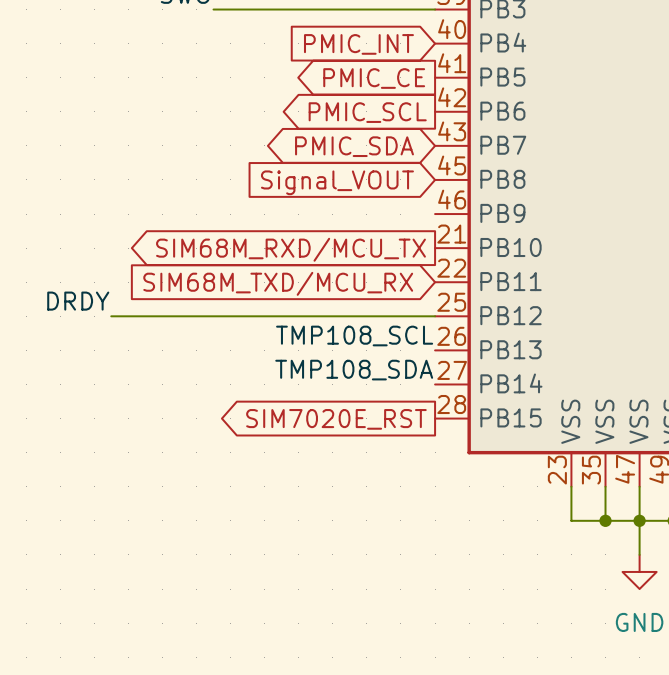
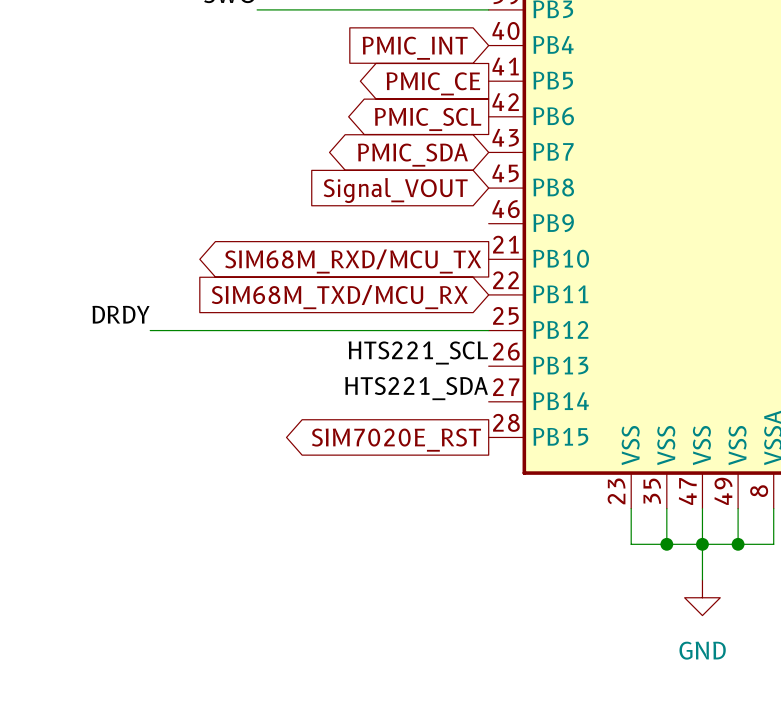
label: TMP108_SCL (354, 335) -> HTS221_SCL (418, 352)
label: TMP108_SDA (354, 370) -> HTS221_SDA (416, 388)

